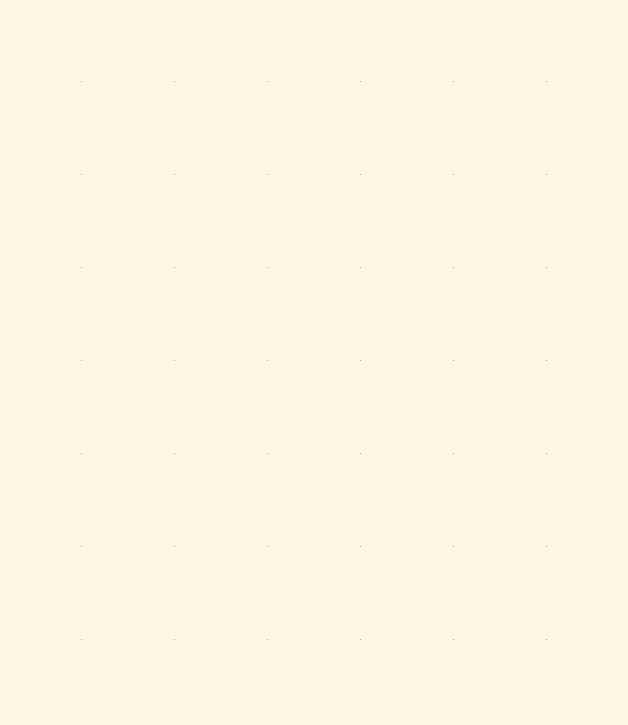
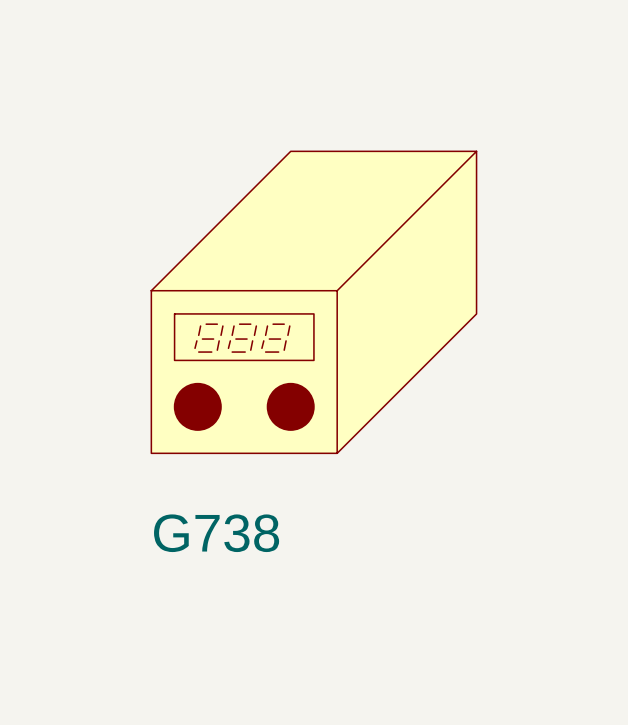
part: none -> G738 (313, 302)

